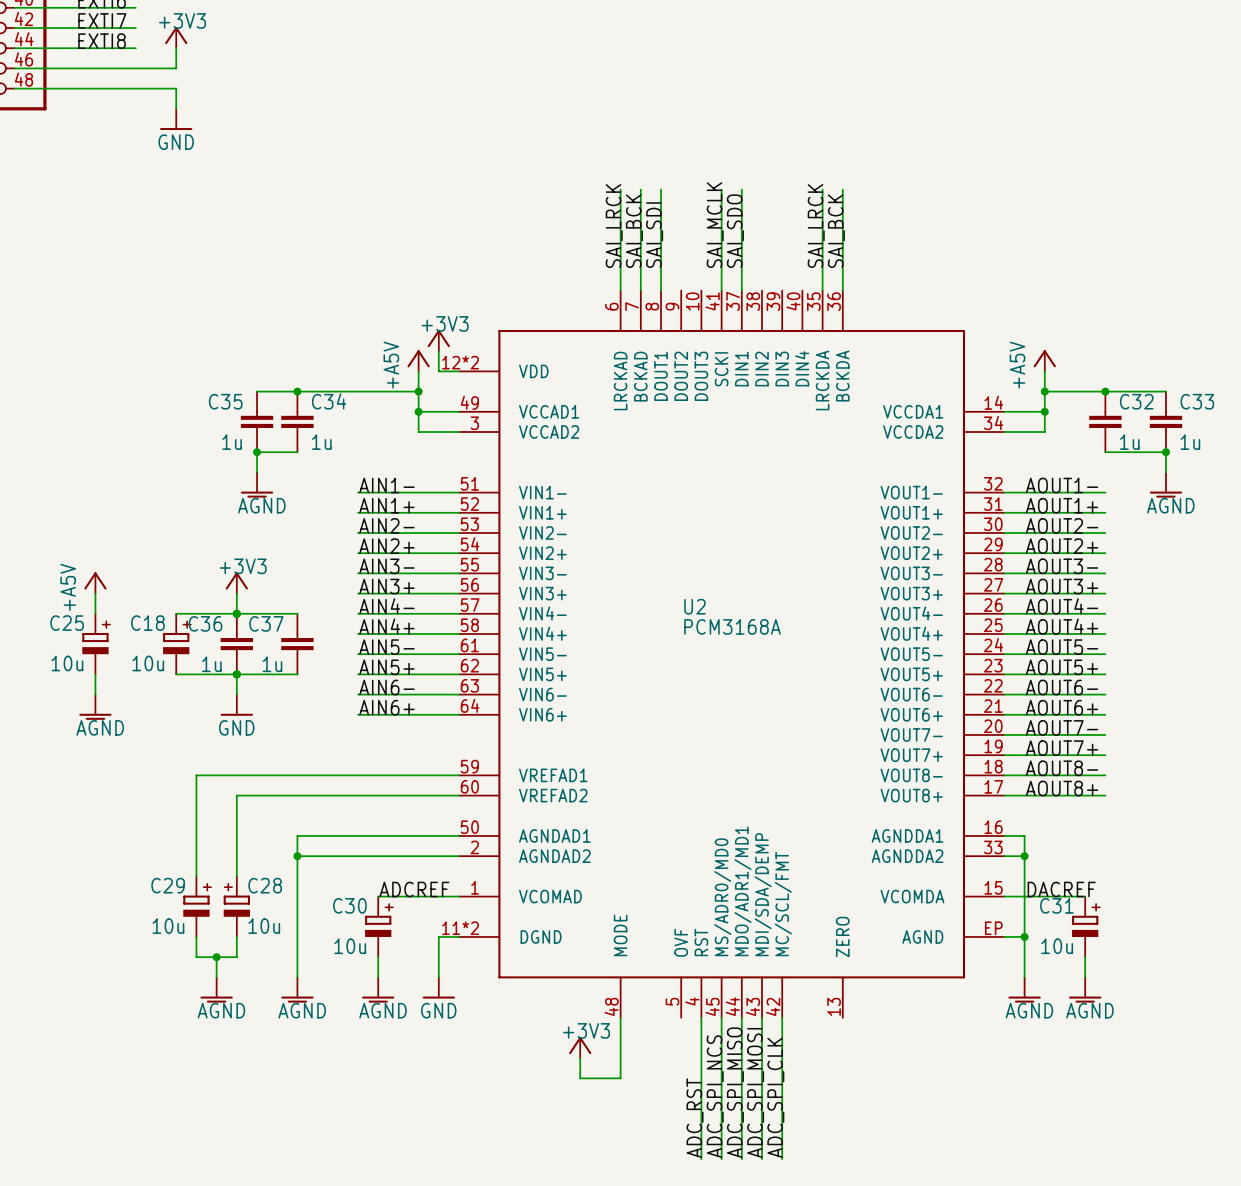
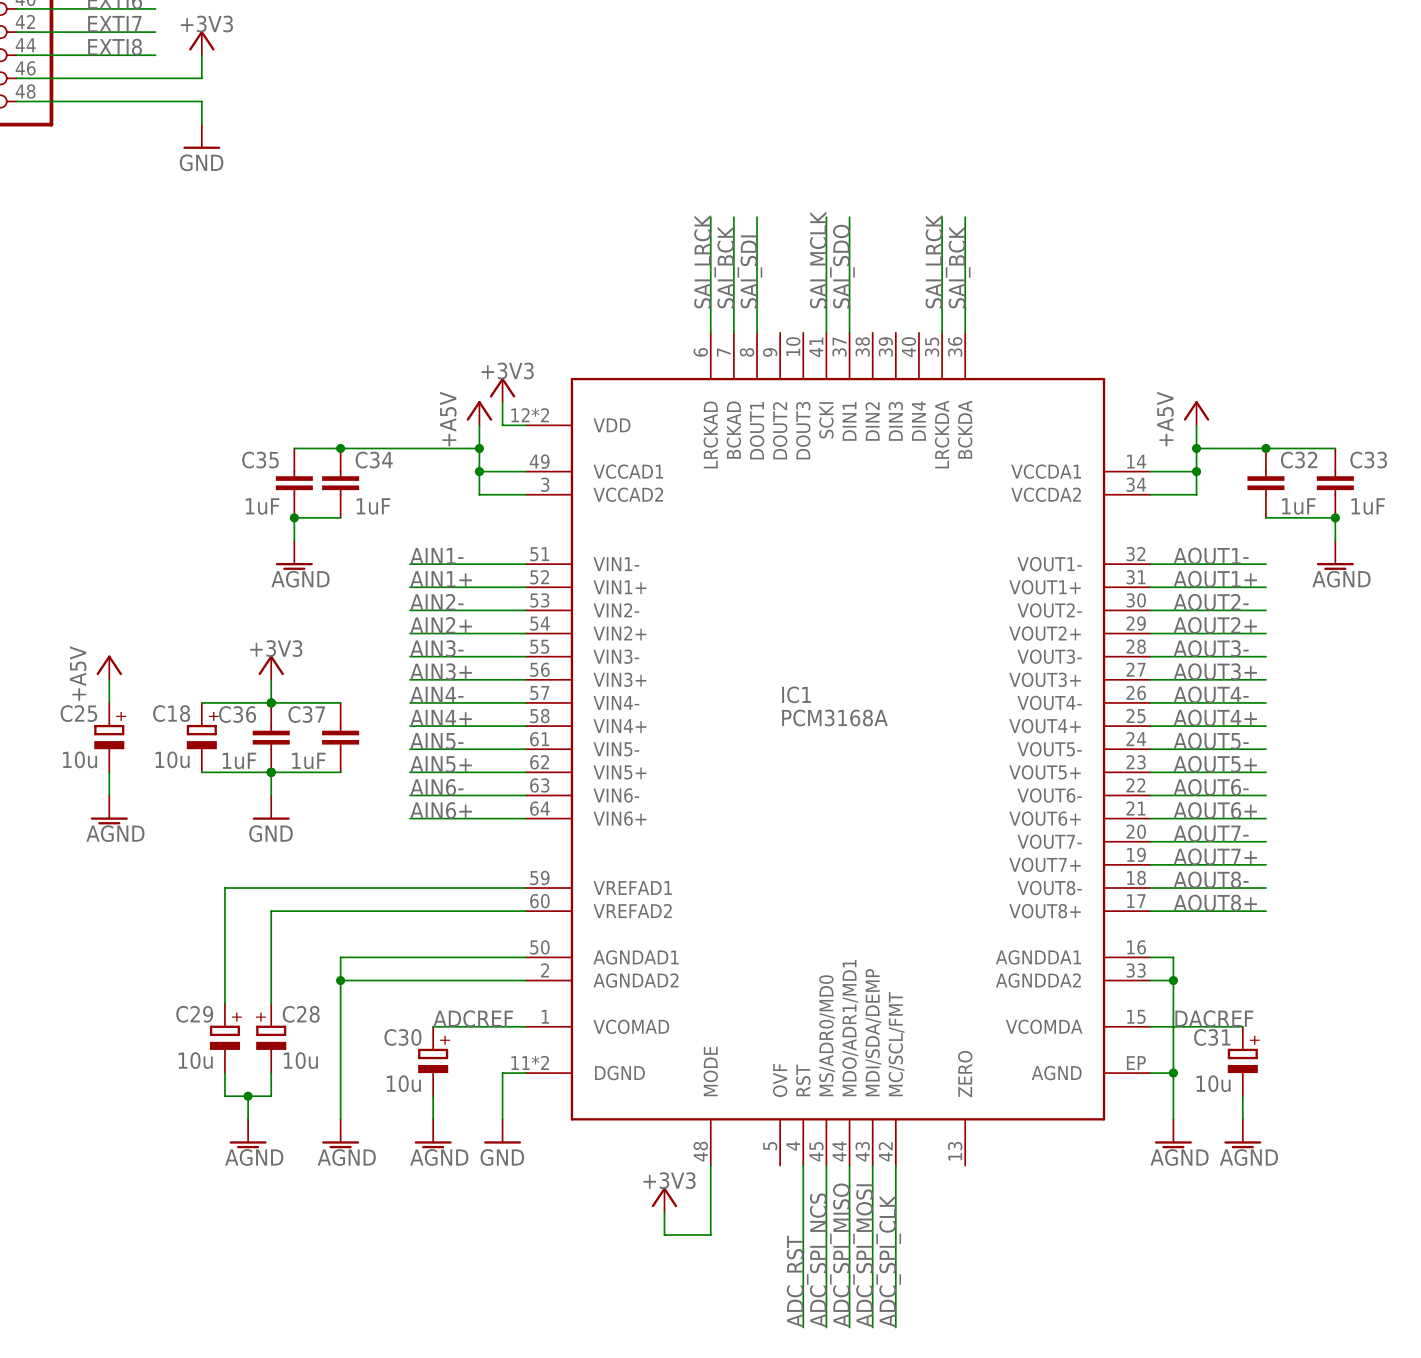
C35 value: 1u (232, 442) -> 1uF (262, 506)
C34 value: 1u (321, 442) -> 1uF (373, 506)
C32 value: 1u (1129, 442) -> 1uF (1298, 506)
C33 value: 1u (1190, 442) -> 1uF (1368, 506)
U2 name: U2 (694, 606) -> IC1 (796, 694)
C36 value: 1u (211, 664) -> 1uF (239, 760)
C37 value: 1u (272, 664) -> 1uF (308, 760)

